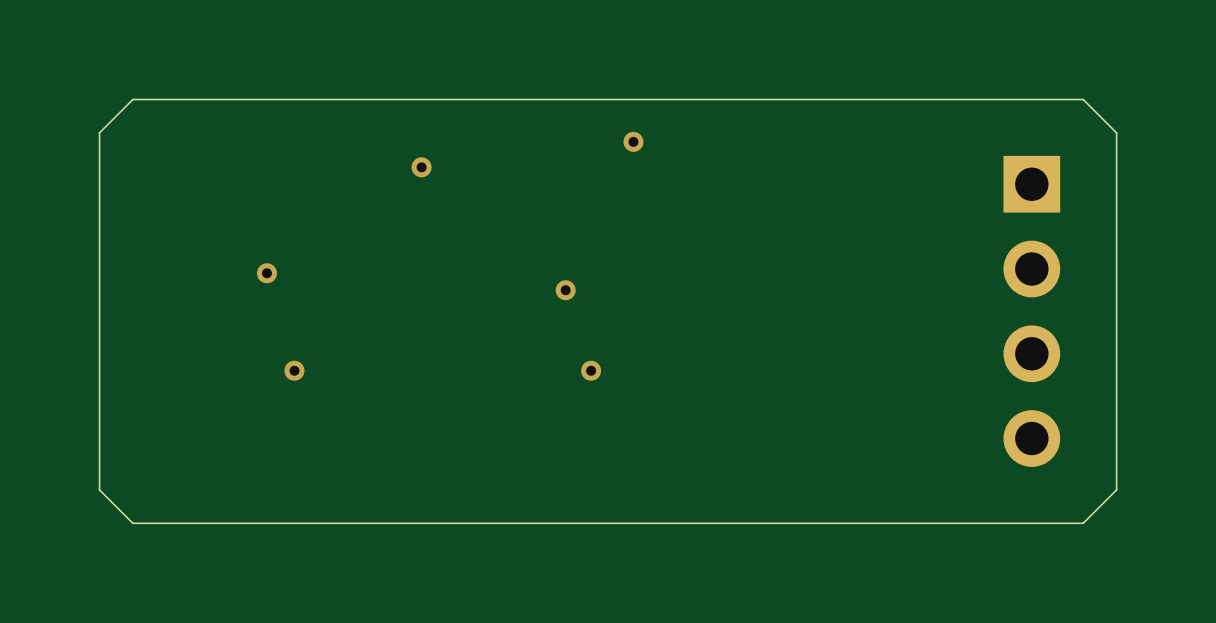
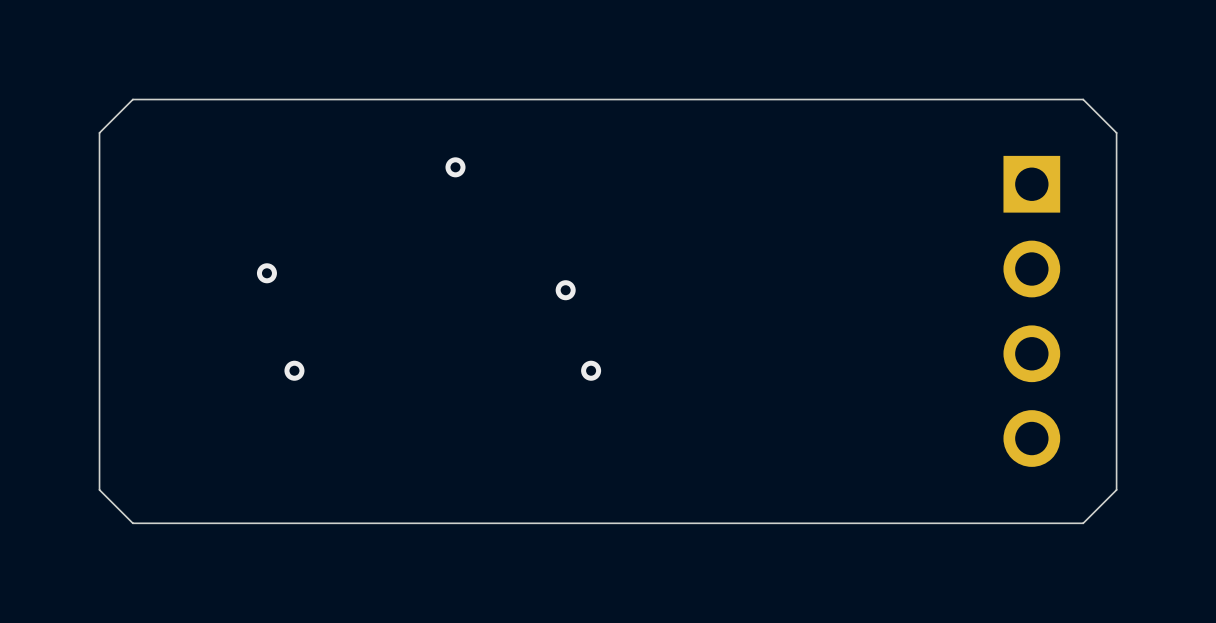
via: (633, 141) -> none
via position: (421, 167) -> (455, 167)

